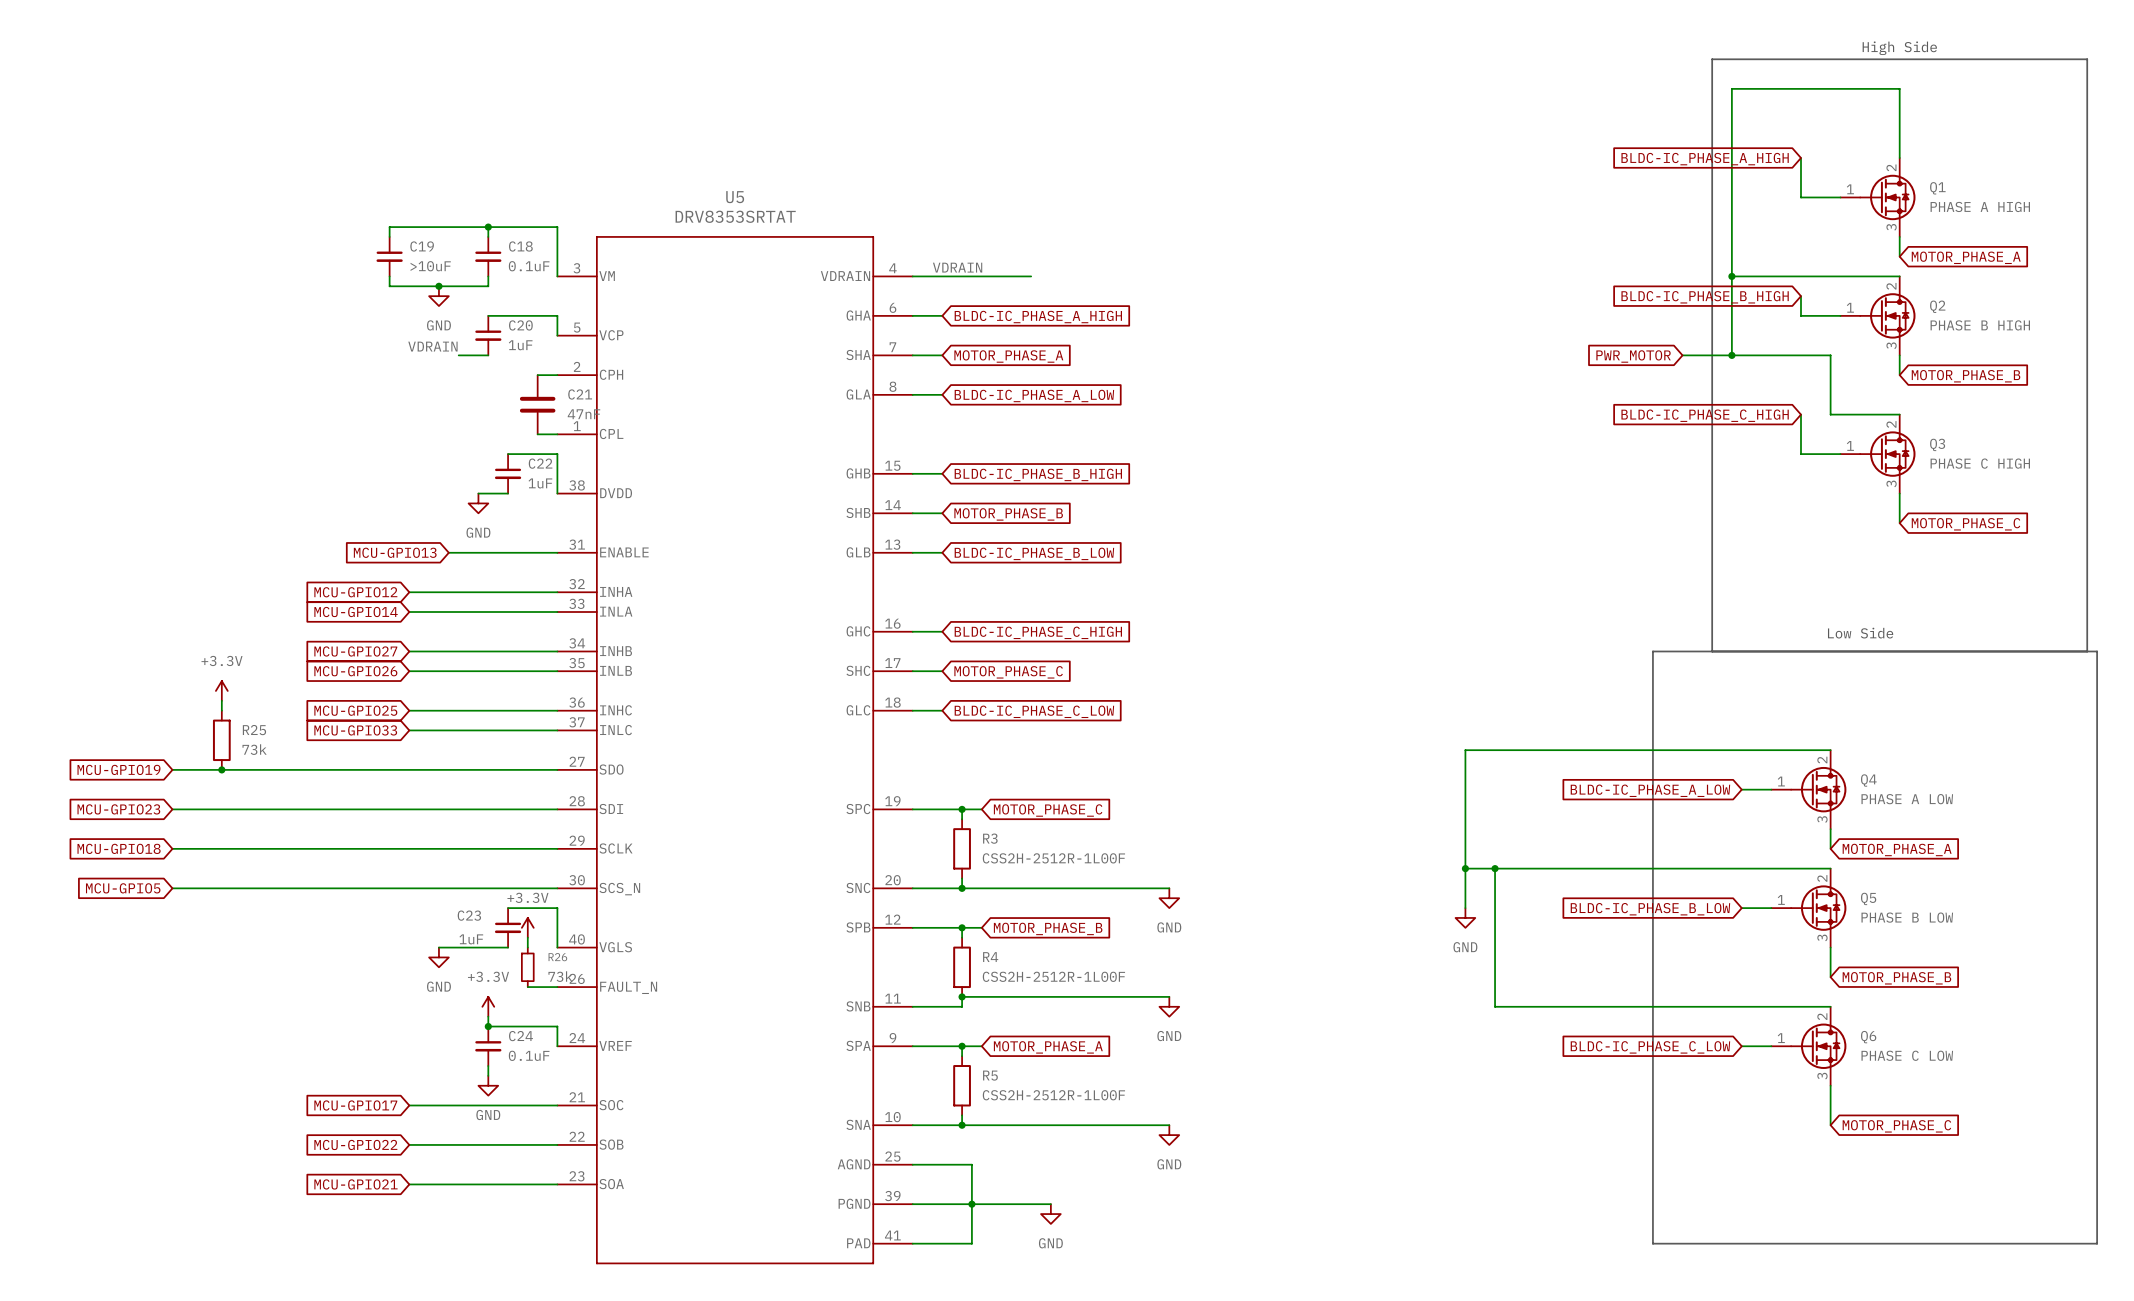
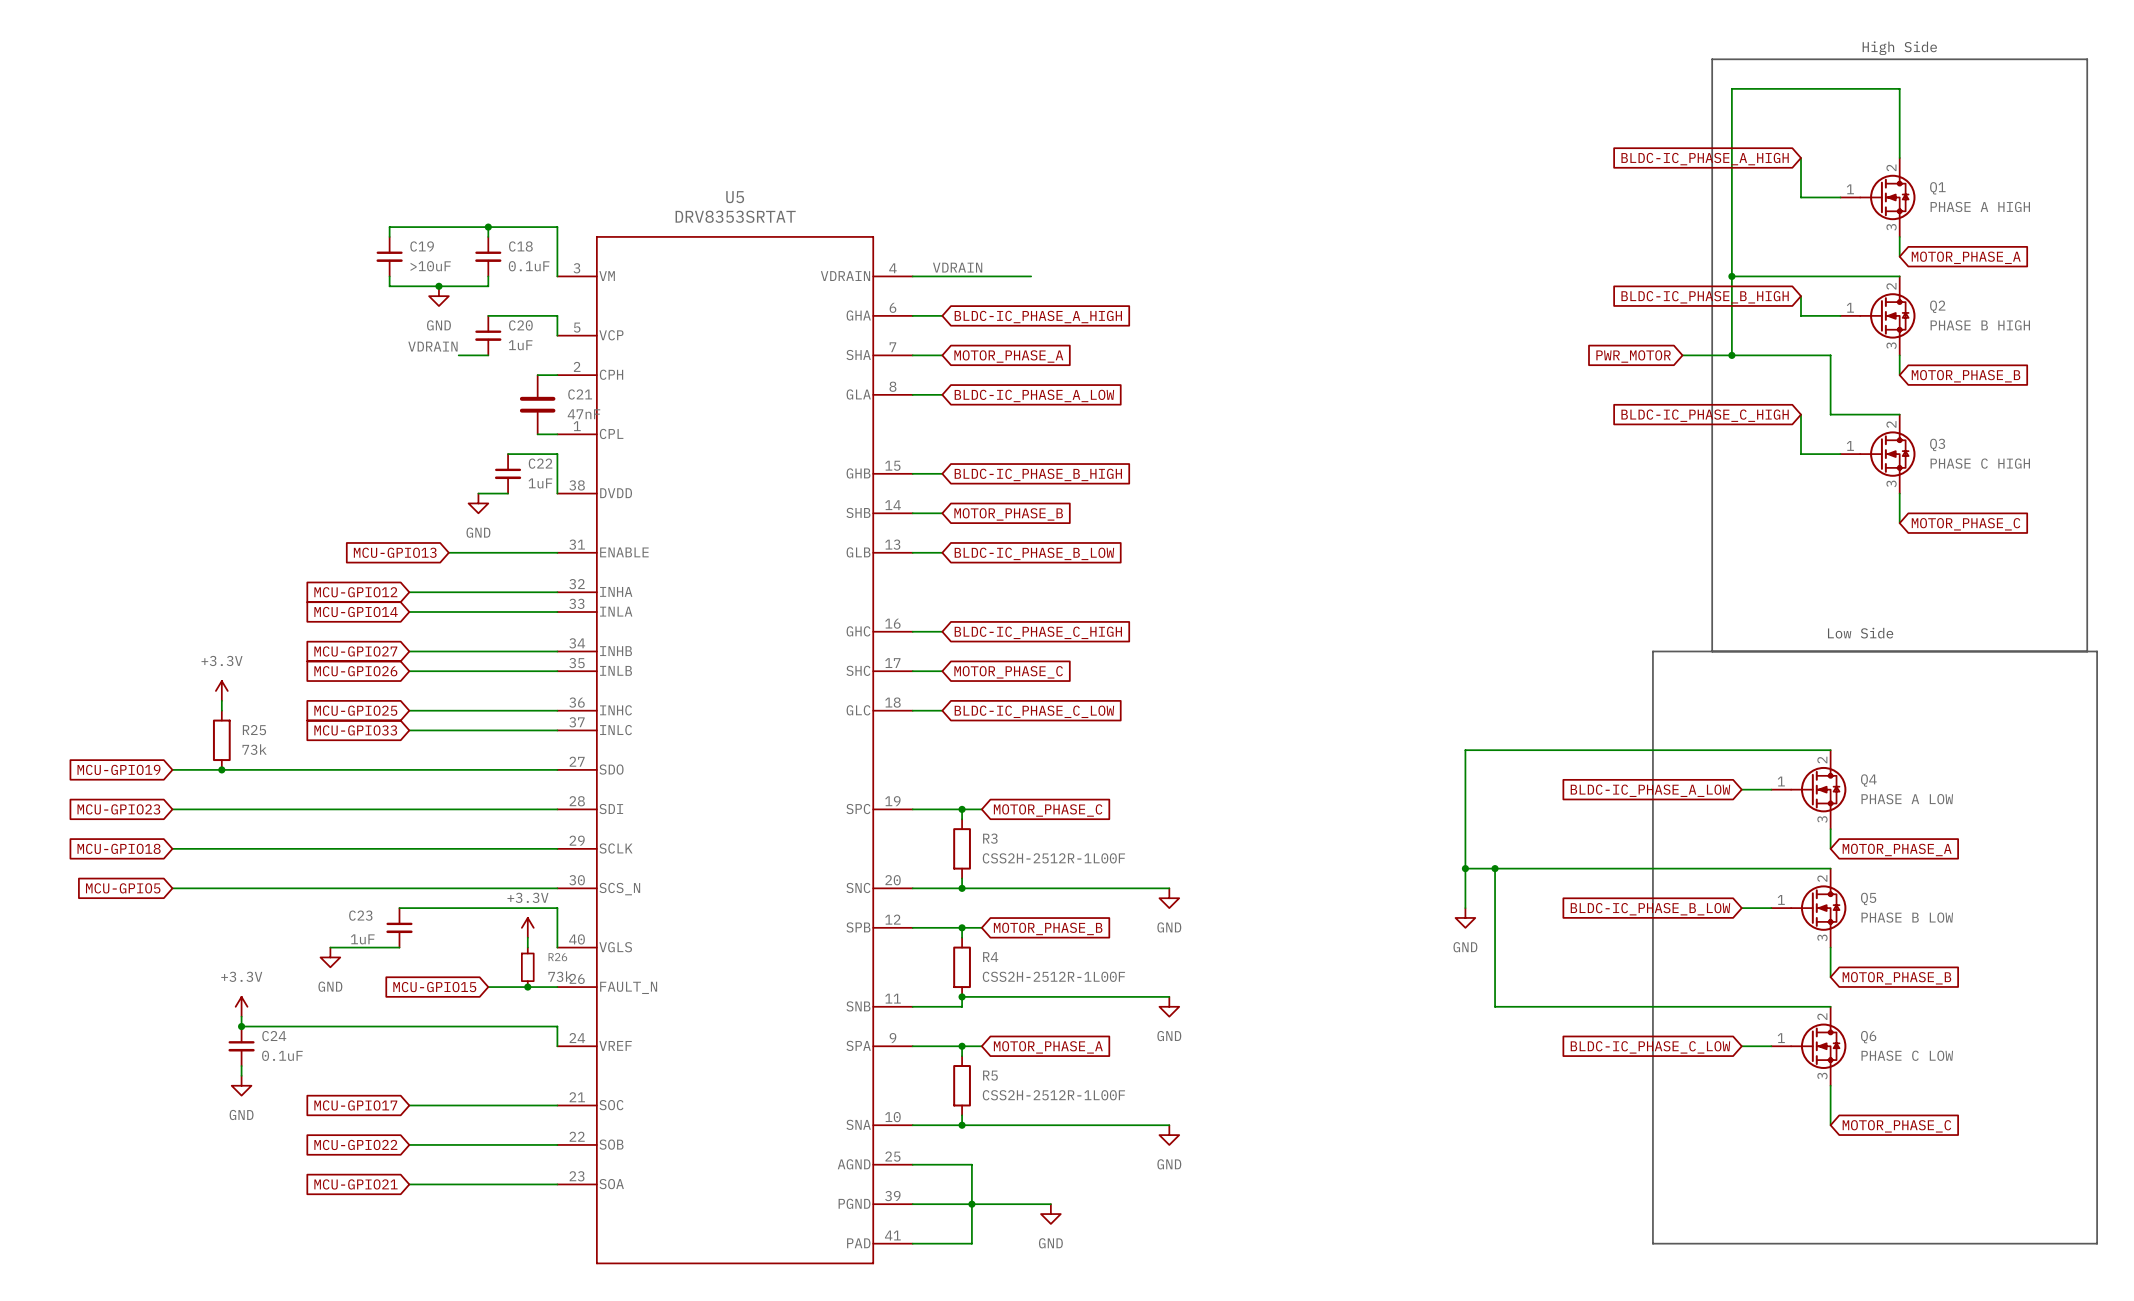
wire: none -> (399, 908) (508, 908)
C23 position: (508, 927) -> (399, 927)
wire: (438, 947) (508, 947) -> (330, 947) (399, 947)
power symbol: none -> GND (330, 957)
power symbol: GND (438, 957) -> none
global label: none -> MCU-GPIO15 (434, 987)
wire: none -> (488, 987) (527, 987)
junction: none -> (527, 987)
power symbol: none -> +3.3V (241, 1006)
power symbol: +3.3V (488, 1006) -> none
wire: (488, 1016) (488, 1026) -> (241, 1016) (241, 1026) (488, 1026)
junction: none -> (241, 1026)
junction: (488, 1026) -> none
C24 position: (488, 1046) -> (241, 1046)
wire: none -> (241, 1066) (241, 1075)
wire: (488, 1066) (488, 1075) -> none
power symbol: none -> GND (241, 1085)
power symbol: GND (488, 1085) -> none

